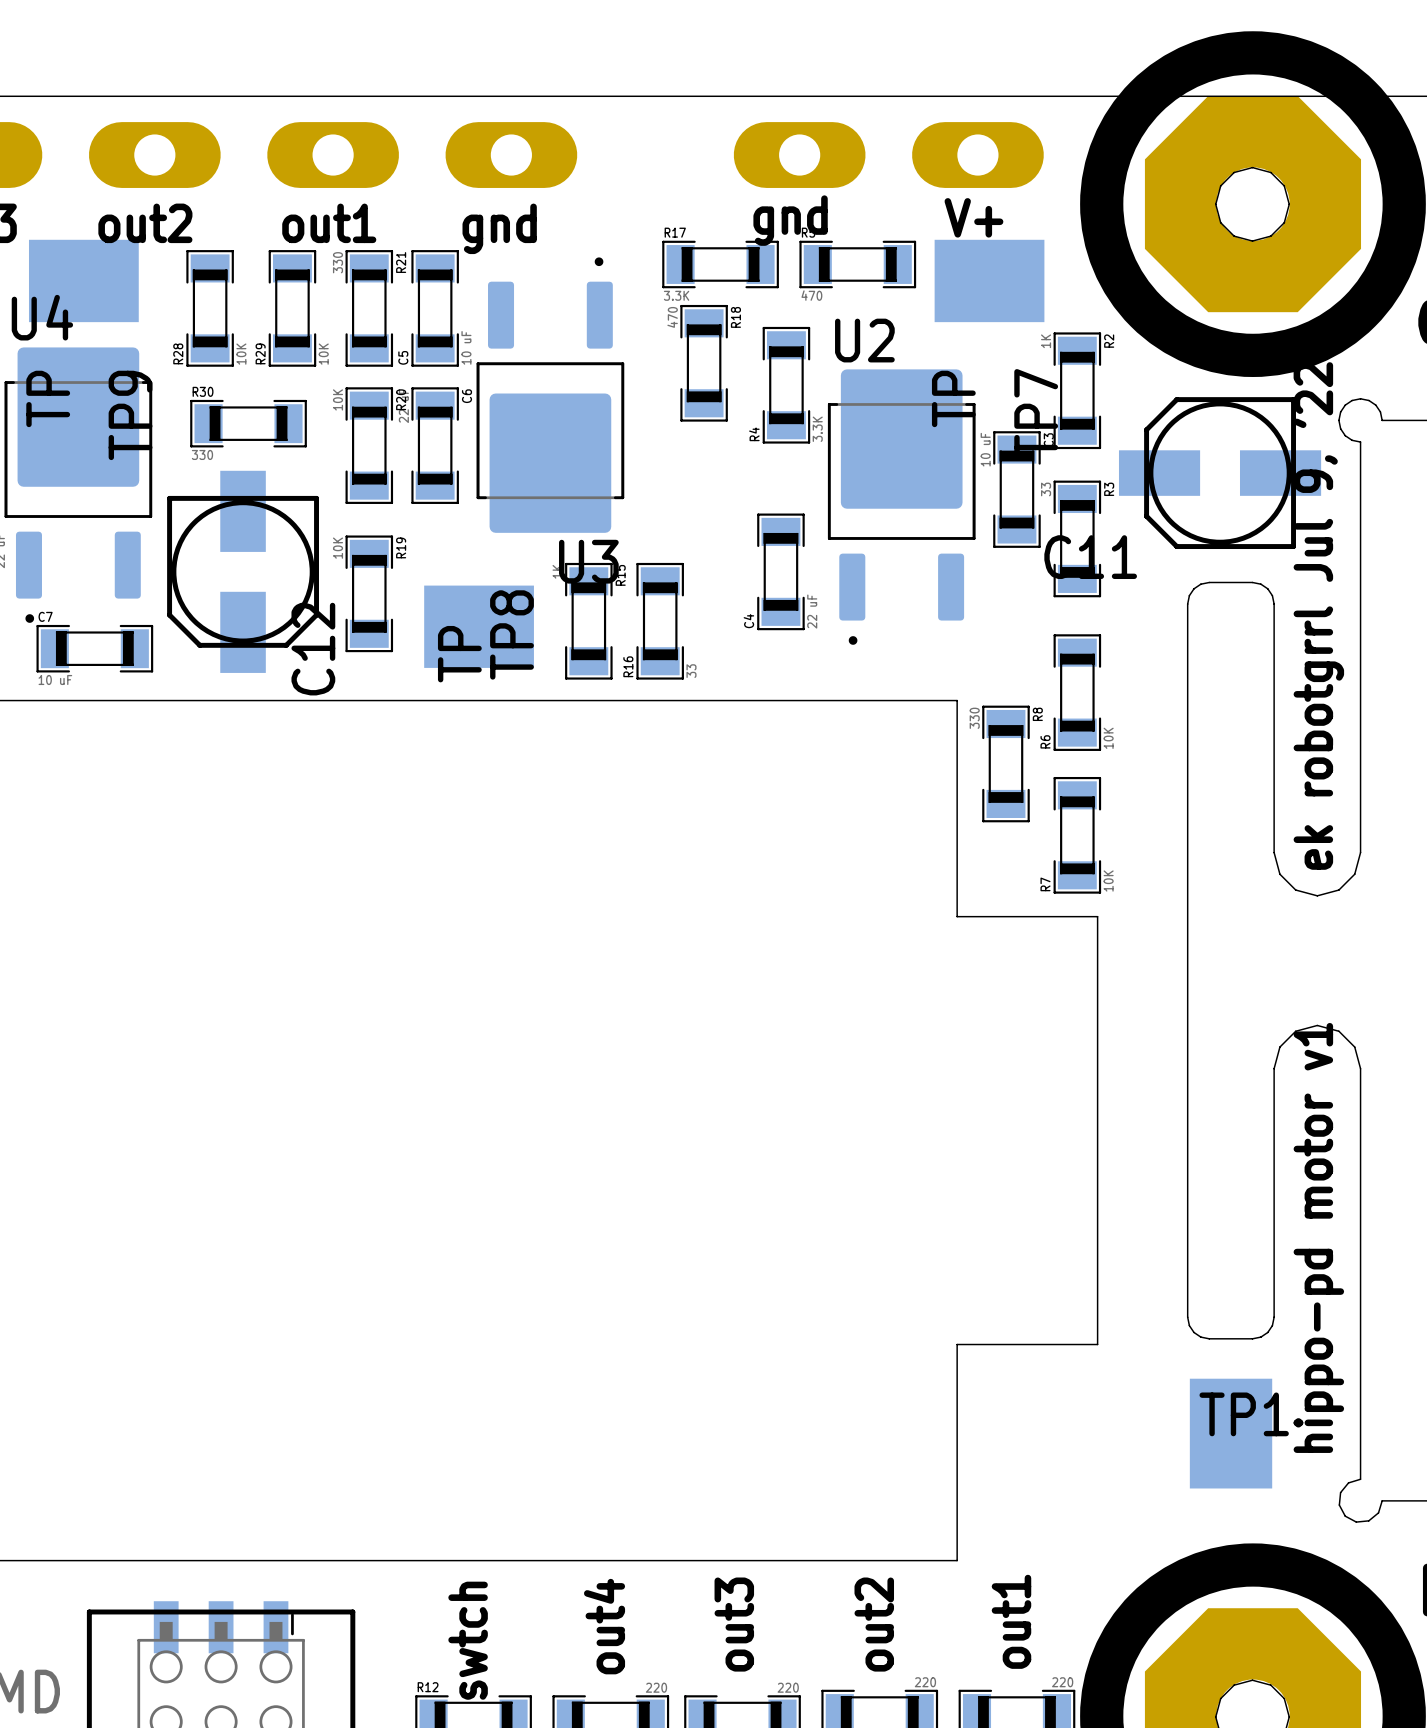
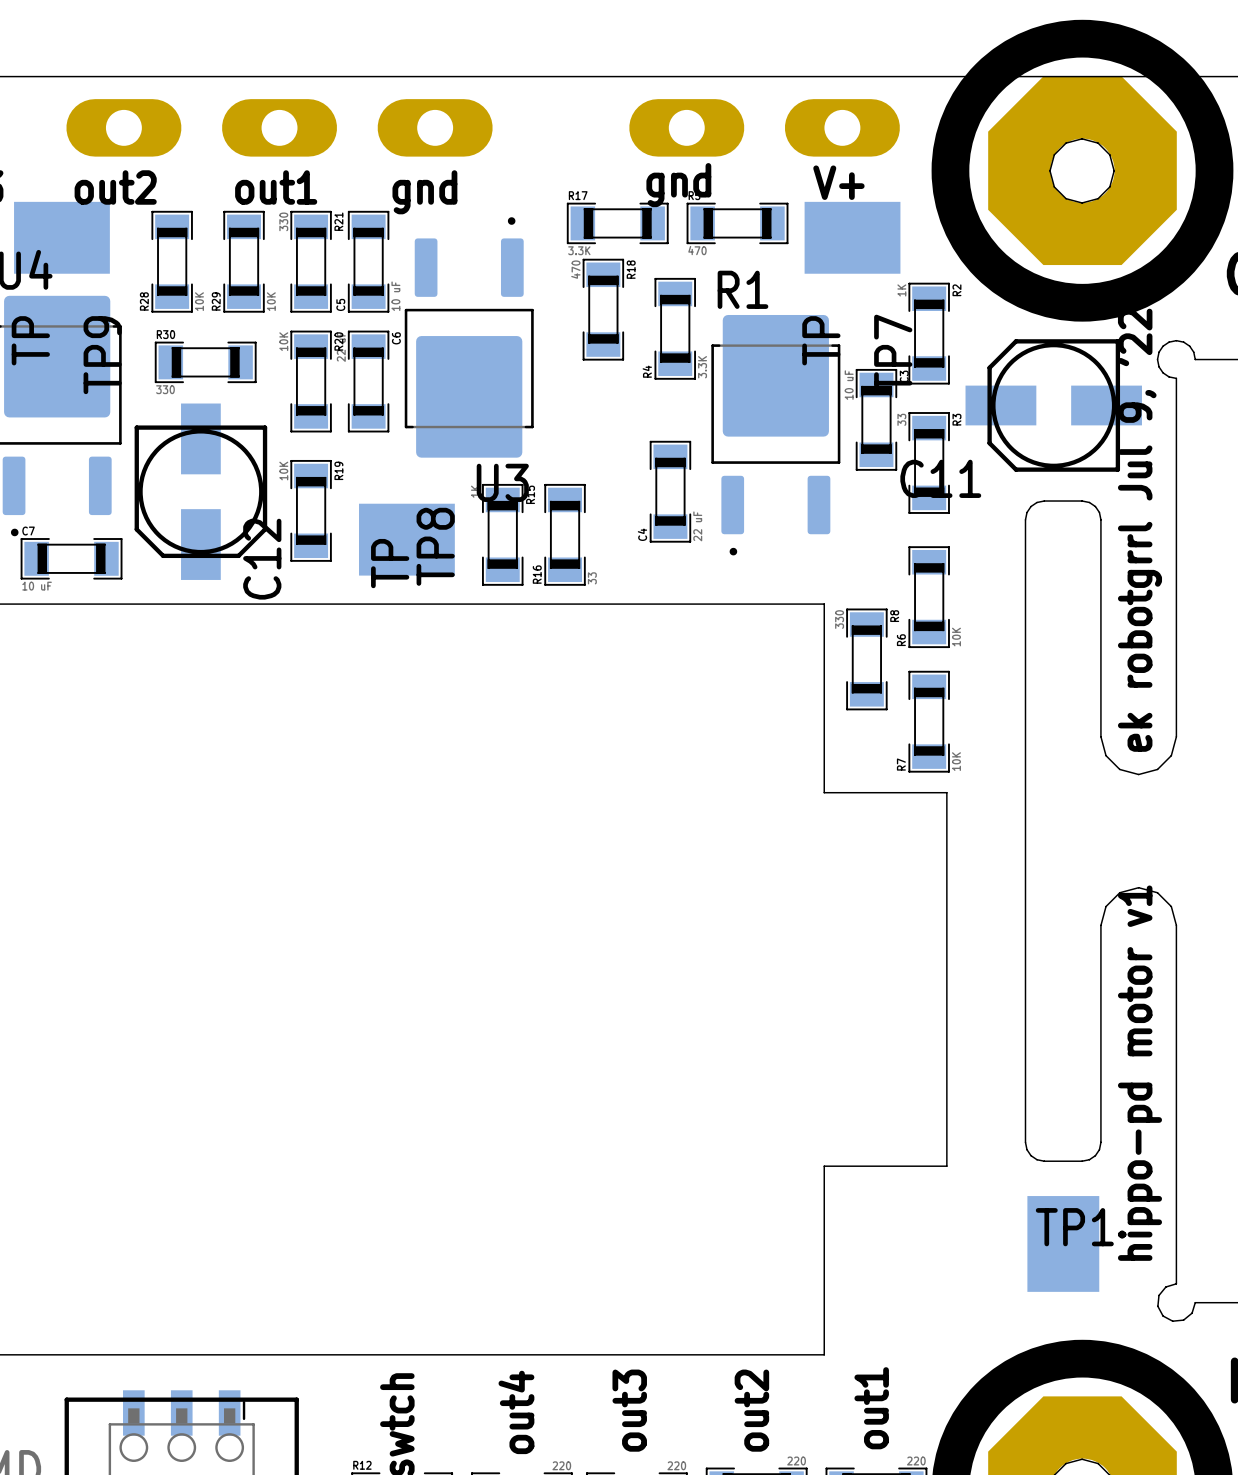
U2 name: U2 (864, 340) -> R1 (743, 289)

